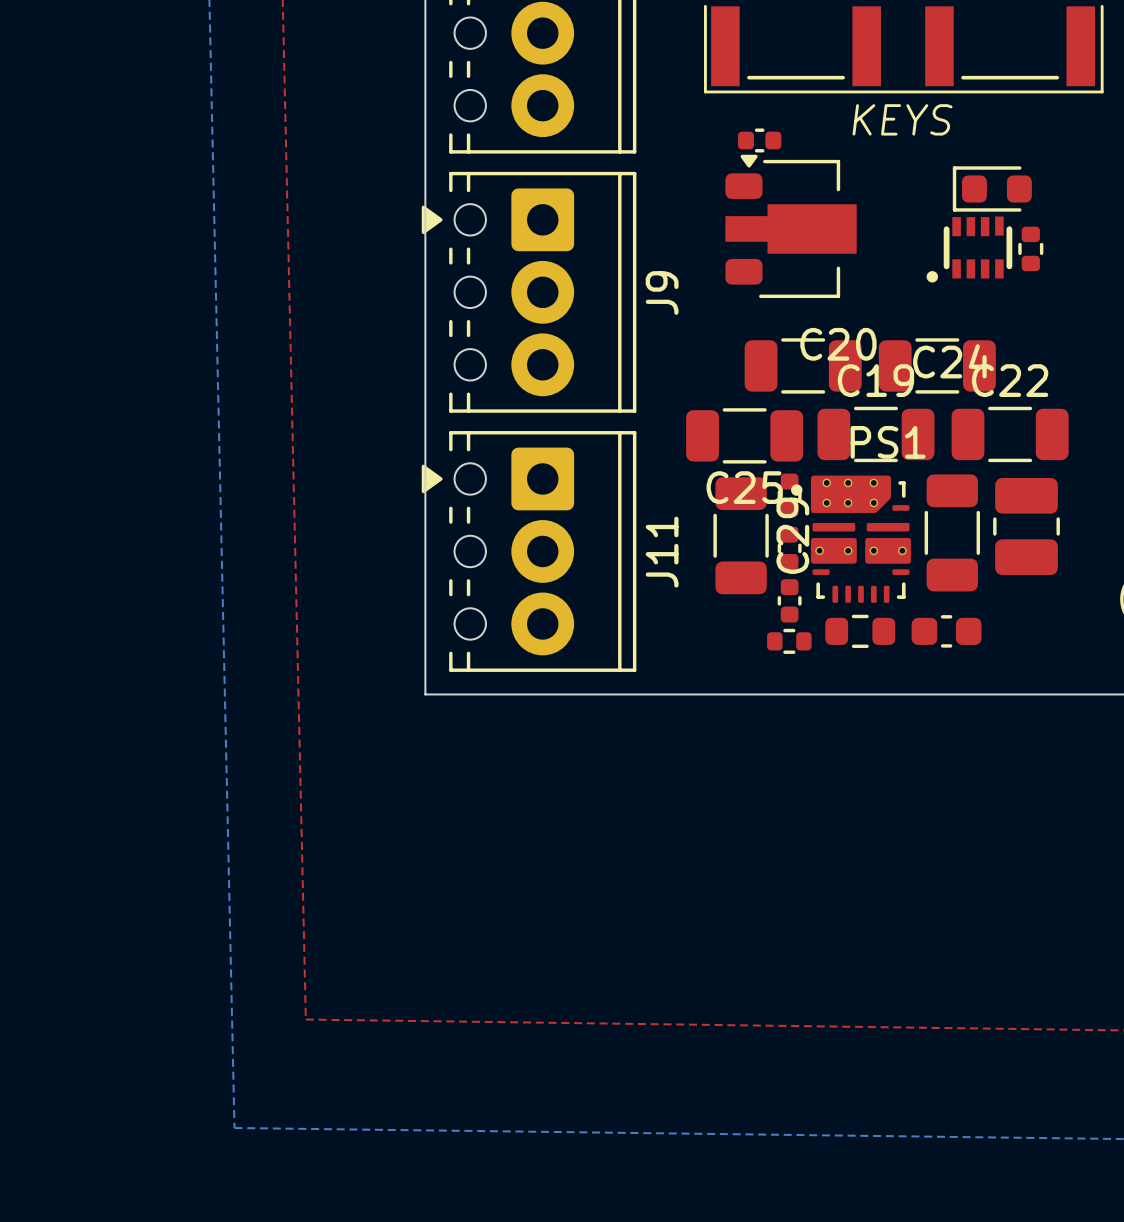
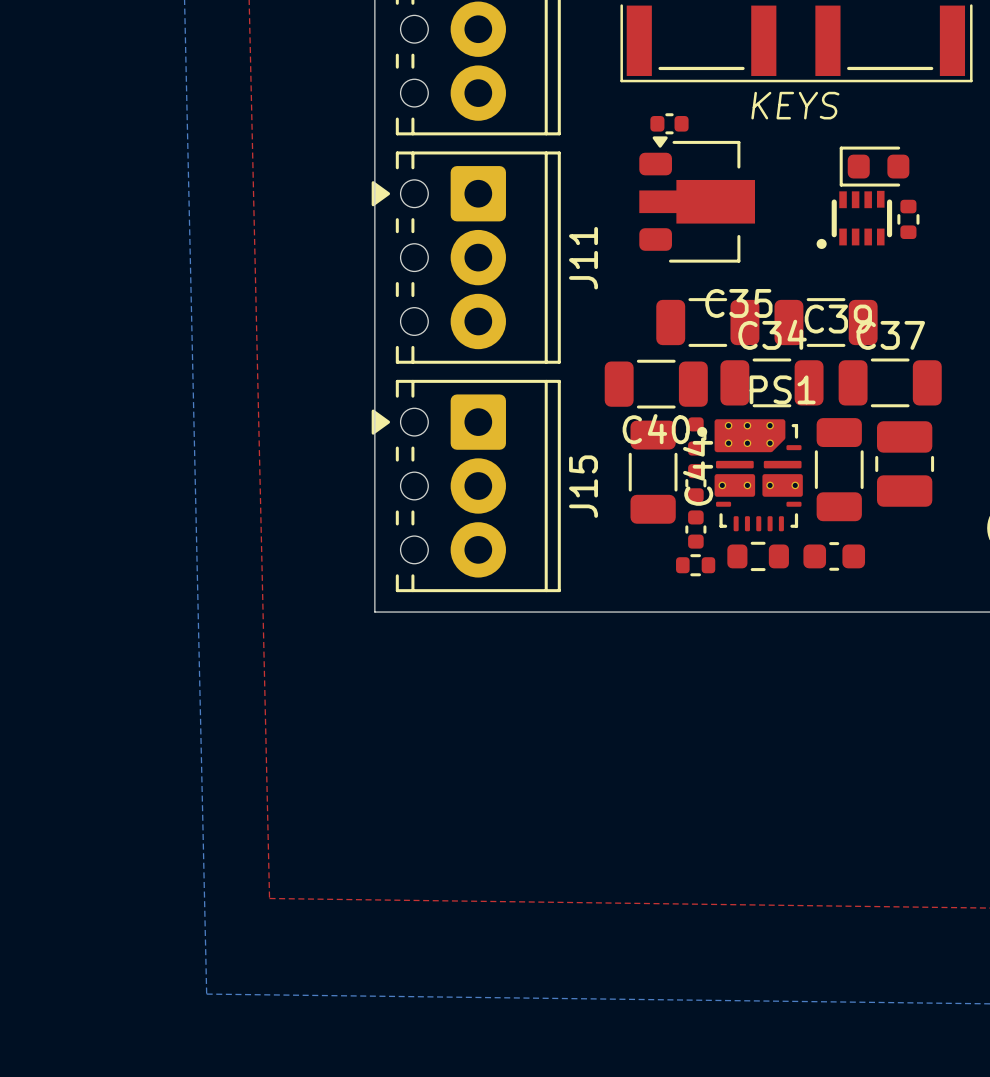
J9 name: J9 (662, 292) -> J11 (583, 258)
C20 name: C20 (838, 344) -> C35 (738, 303)
C24 name: C24 (951, 361) -> C39 (838, 319)
C19 name: C19 (875, 380) -> C34 (772, 334)
C22 name: C22 (1010, 380) -> C37 (890, 335)
C25 name: C25 (744, 487) -> C40 (656, 429)
C29 name: C29 (792, 535) -> C44 (698, 471)
J11 name: J11 (662, 552) -> J15 (583, 486)

